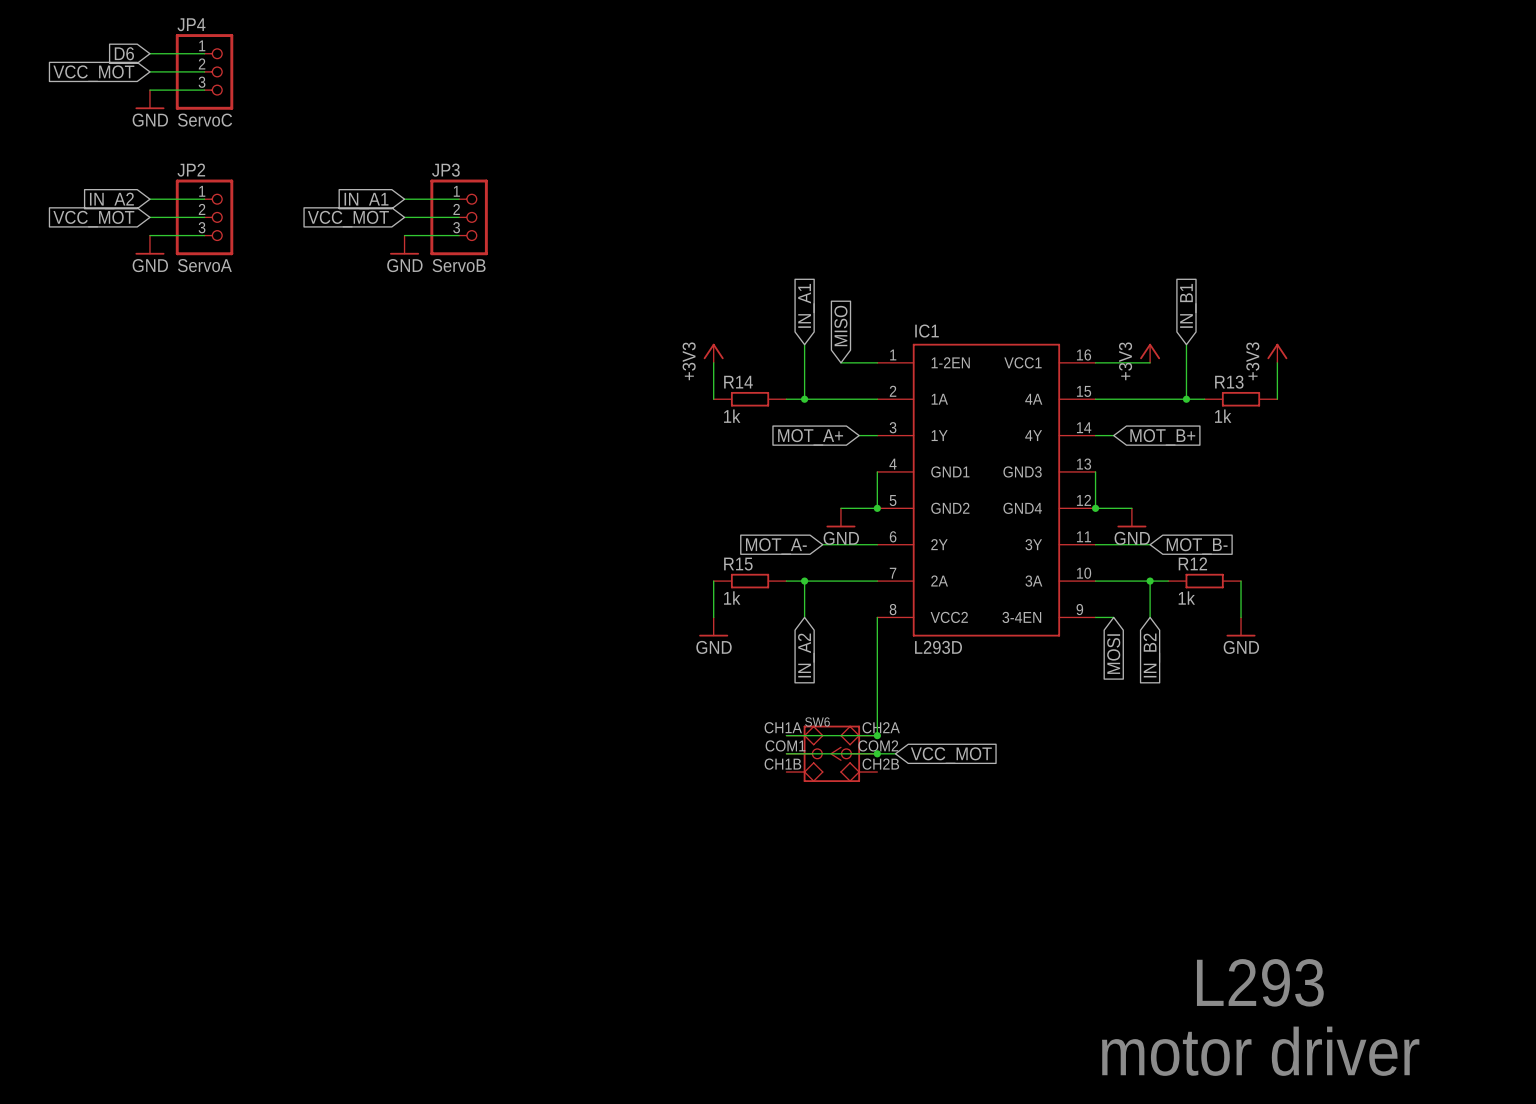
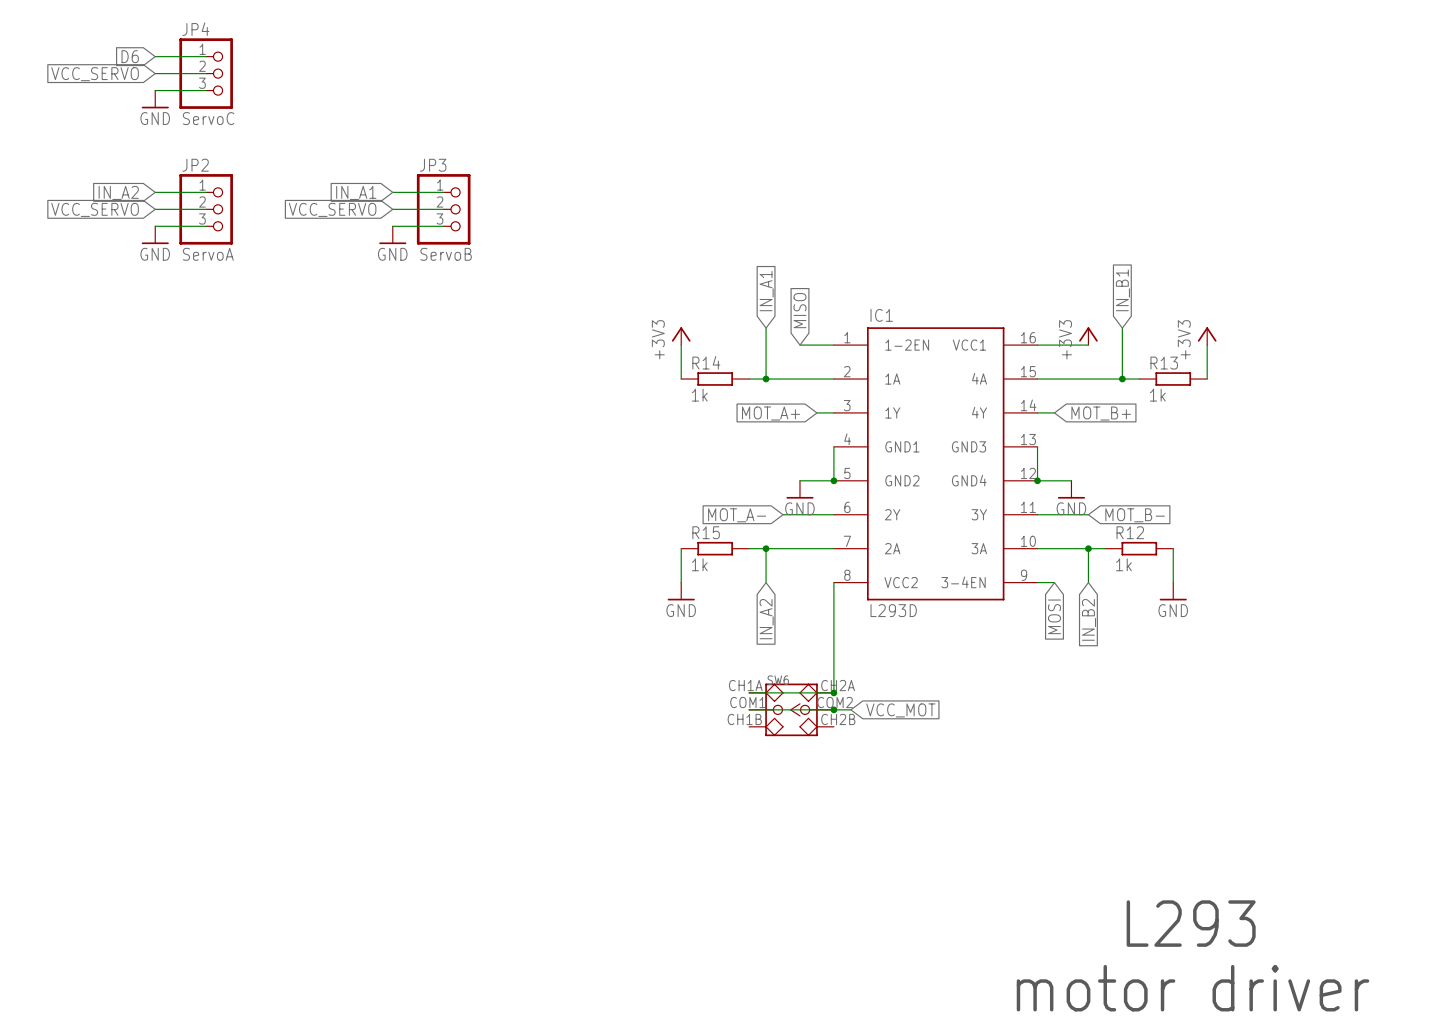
global label: VCC_MOT (93, 73) -> VCC_SERVO (95, 74)
global label: VCC_MOT (93, 219) -> VCC_SERVO (95, 209)
global label: VCC_MOT (348, 219) -> VCC_SERVO (332, 209)

